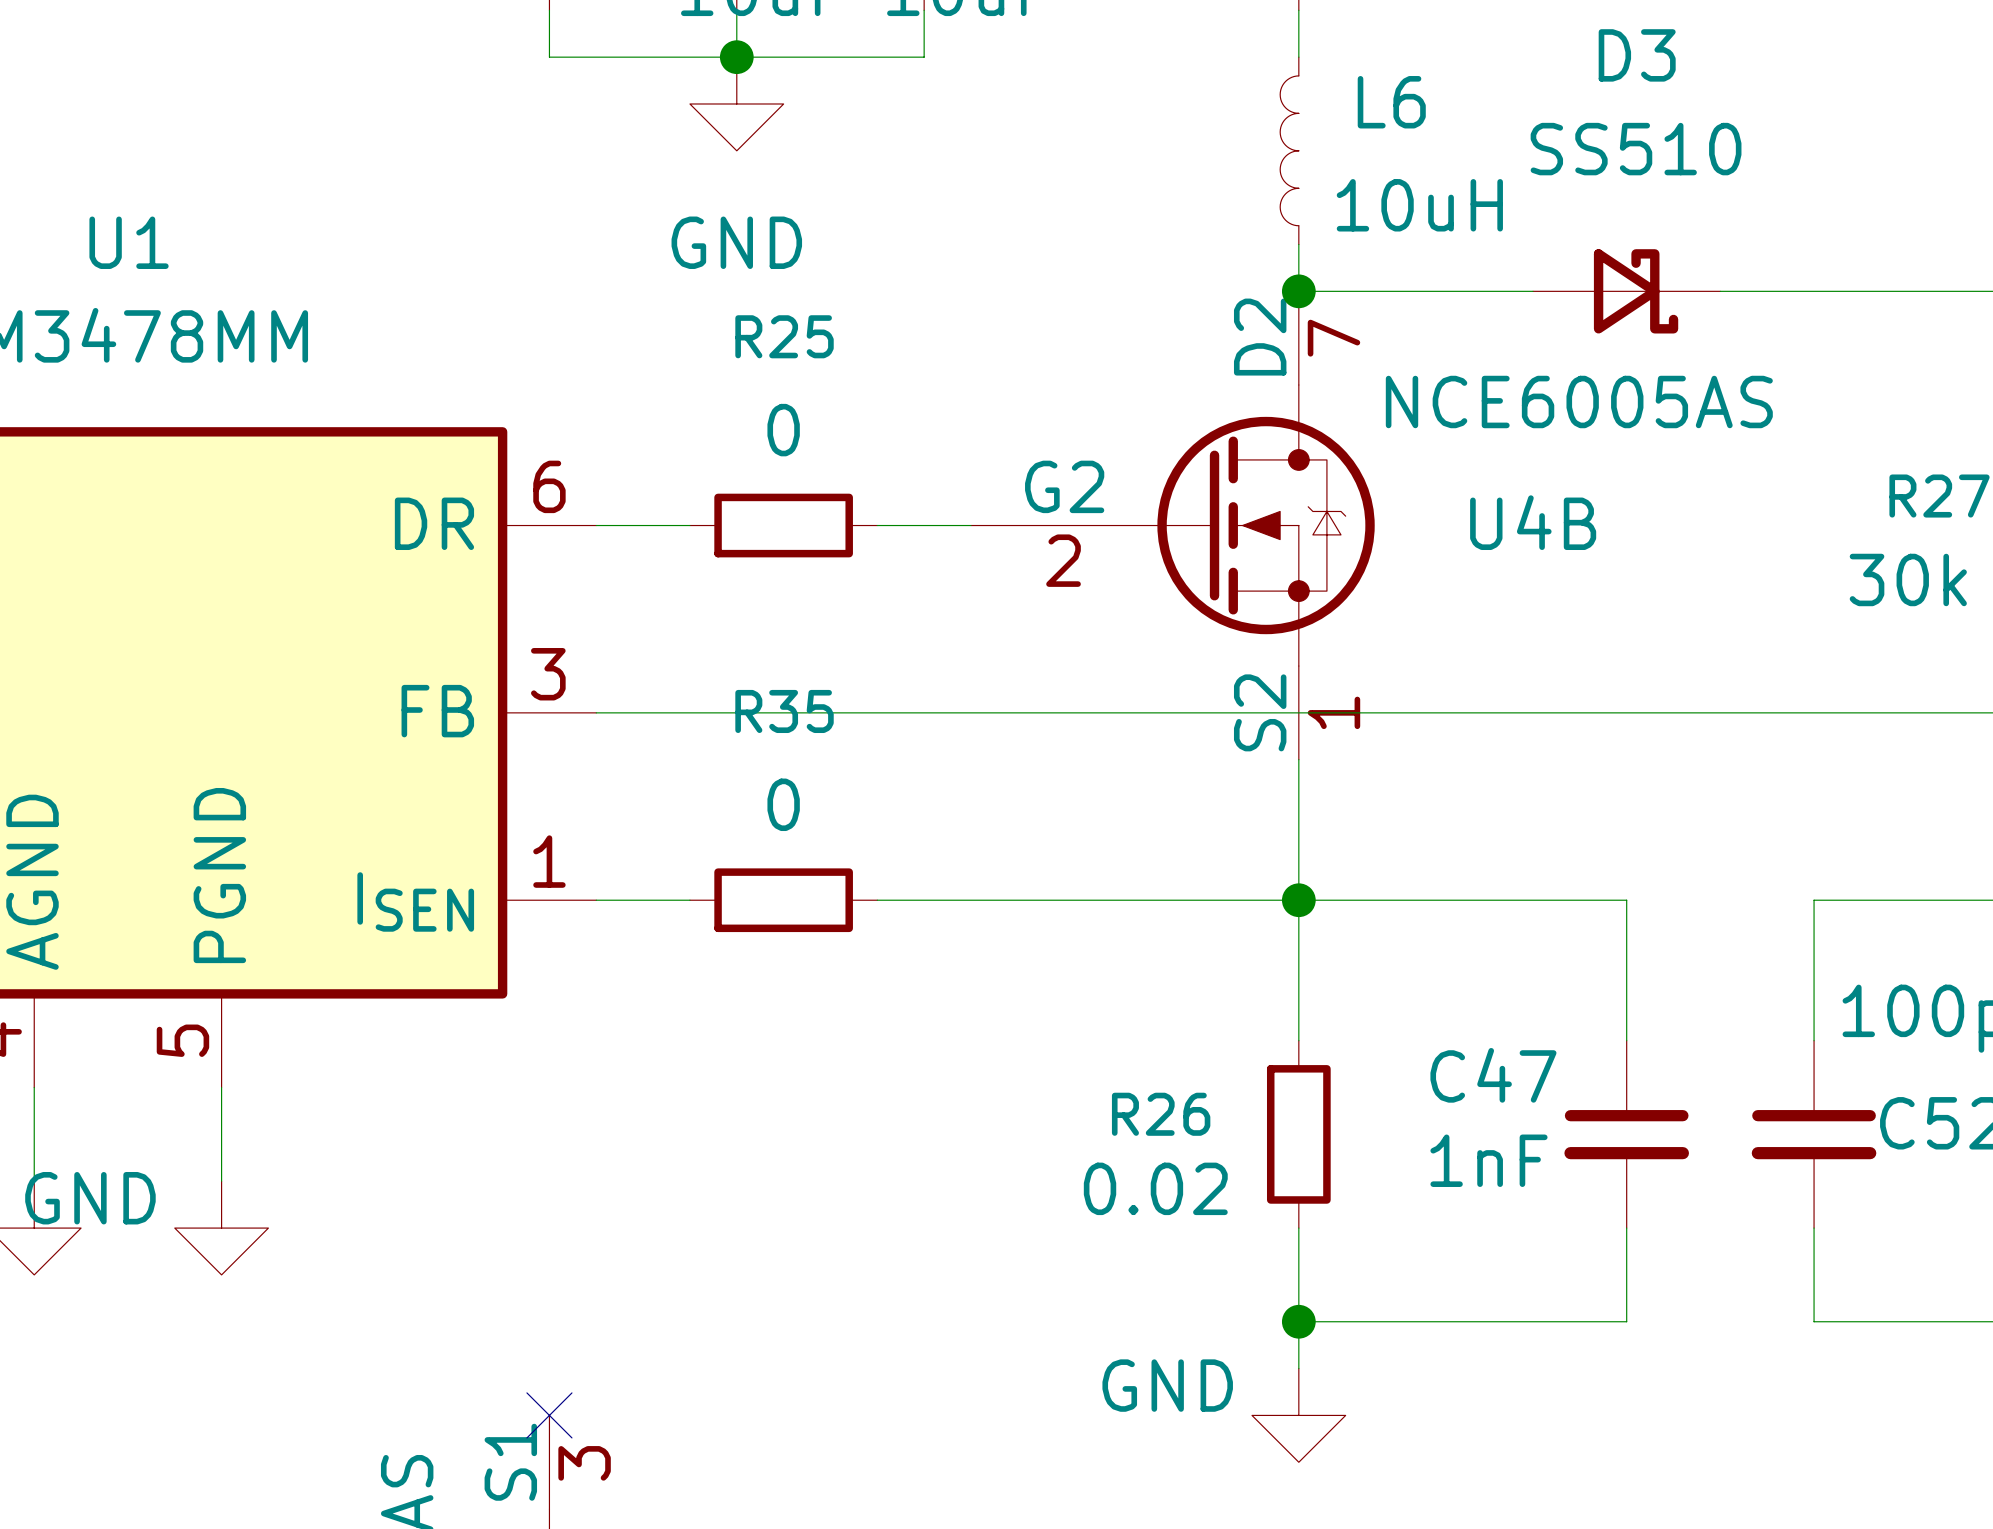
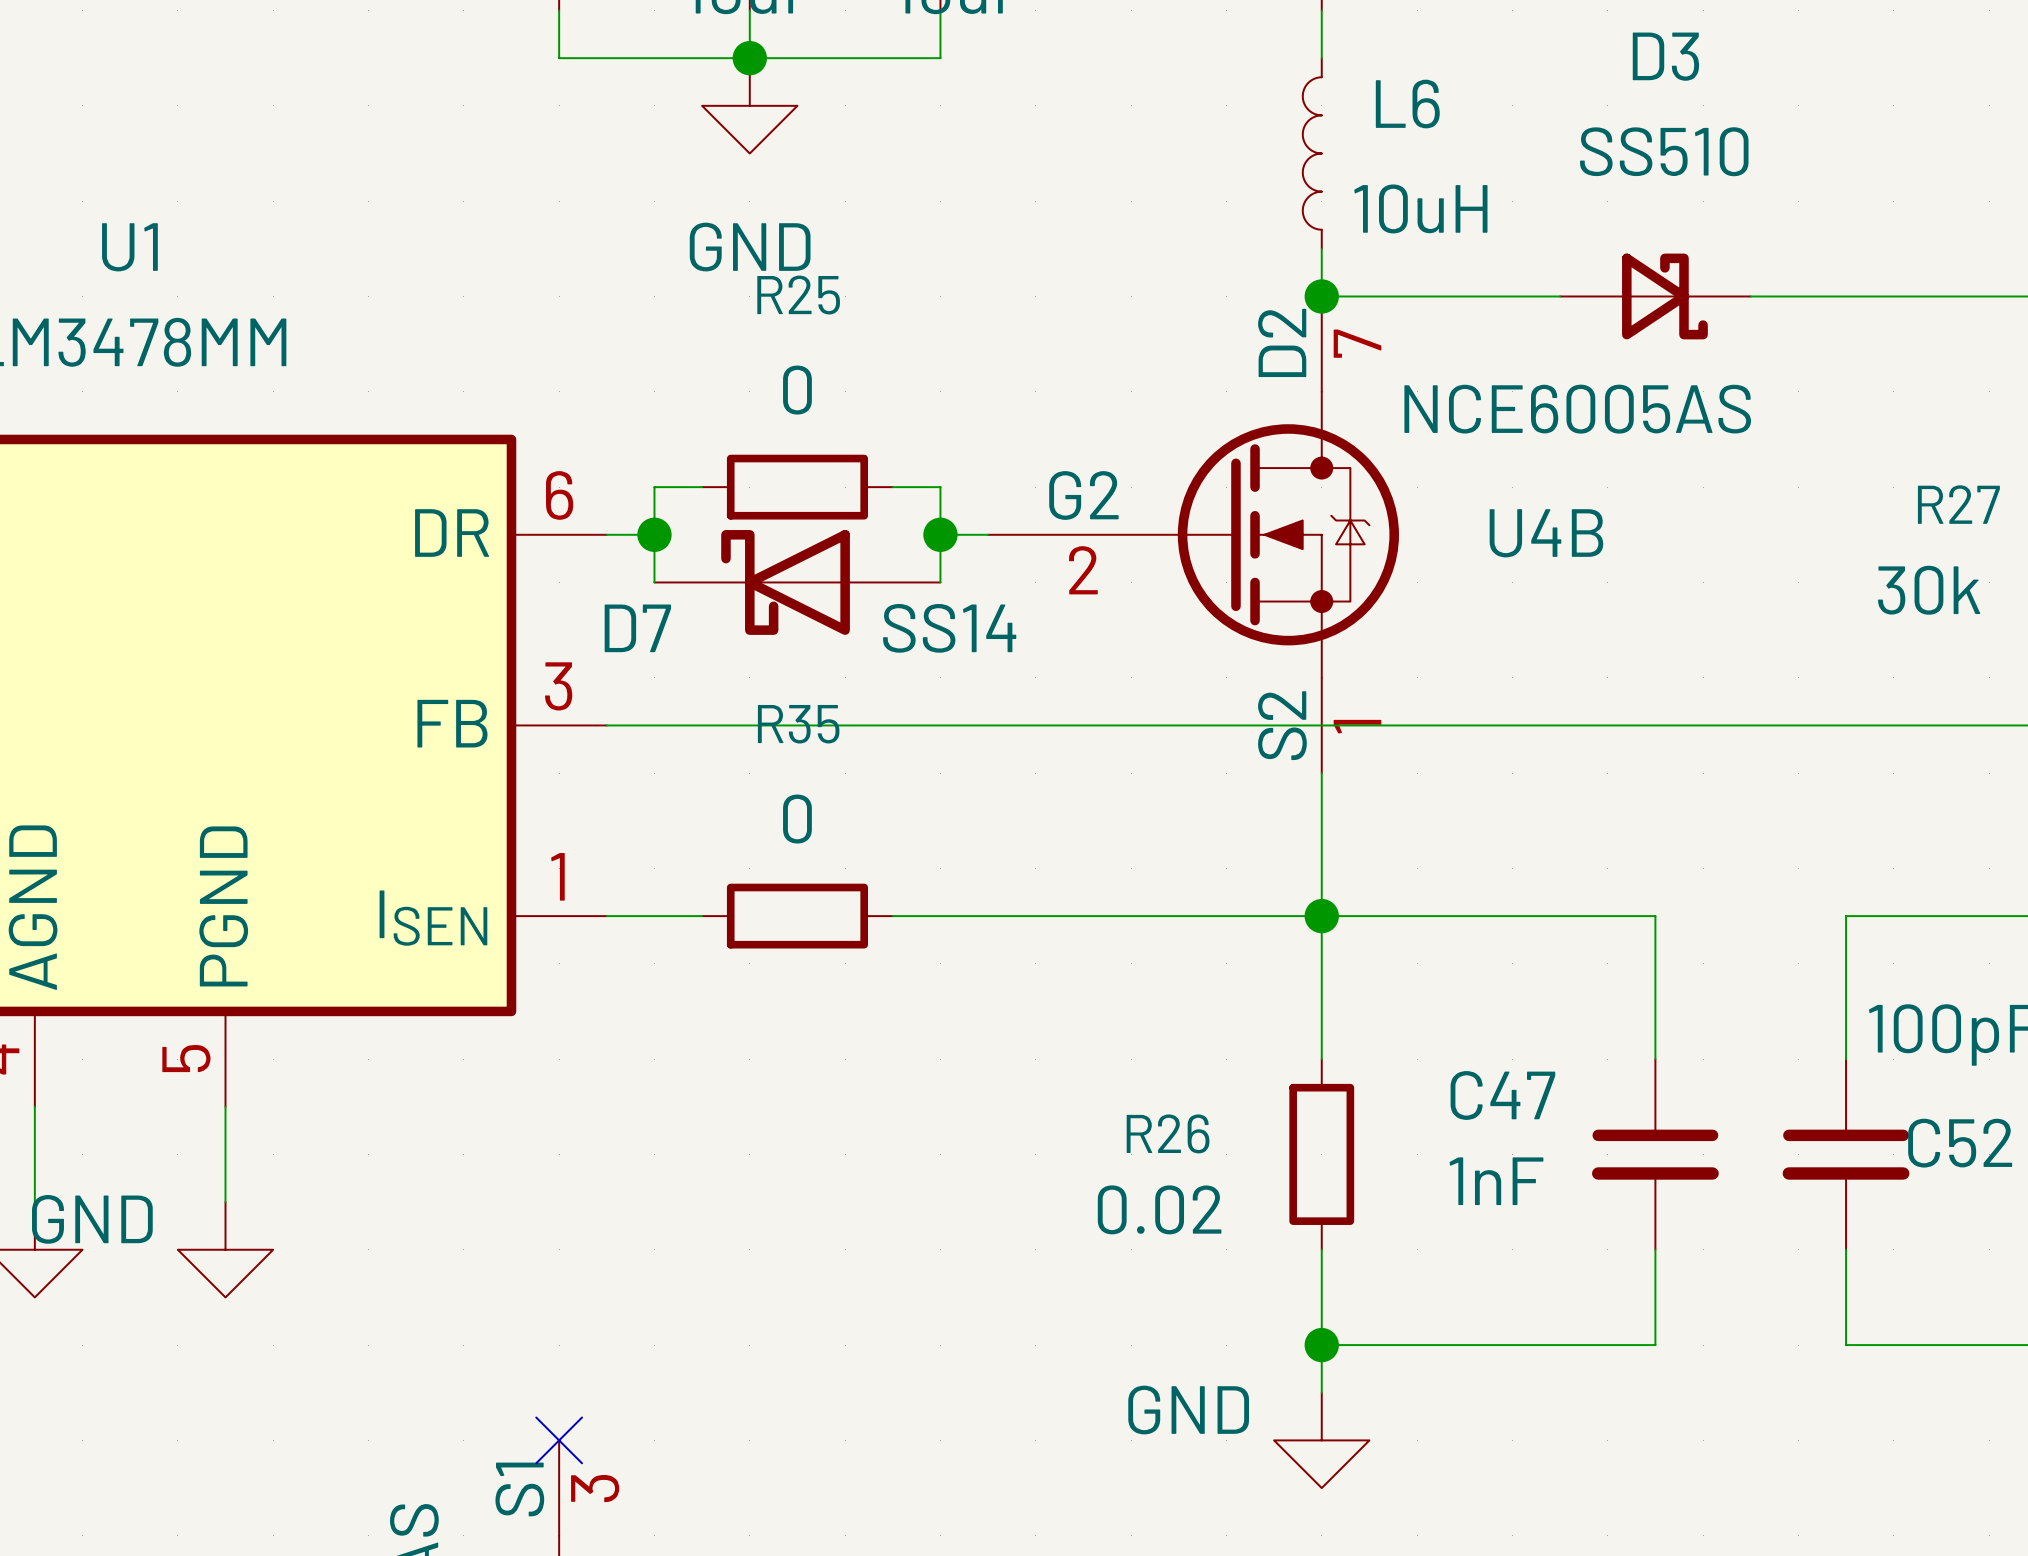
wire: none -> (702, 487) (654, 487) (654, 582)
wire: none -> (892, 487) (940, 487) (940, 582)
wire: (643, 525) (689, 525) -> none
junction: none -> (654, 534)
R25 position: (783, 525) -> (797, 487)
wire: (877, 525) (924, 525) -> none
junction: none -> (940, 534)
D7: none -> SS14 (797, 582)

